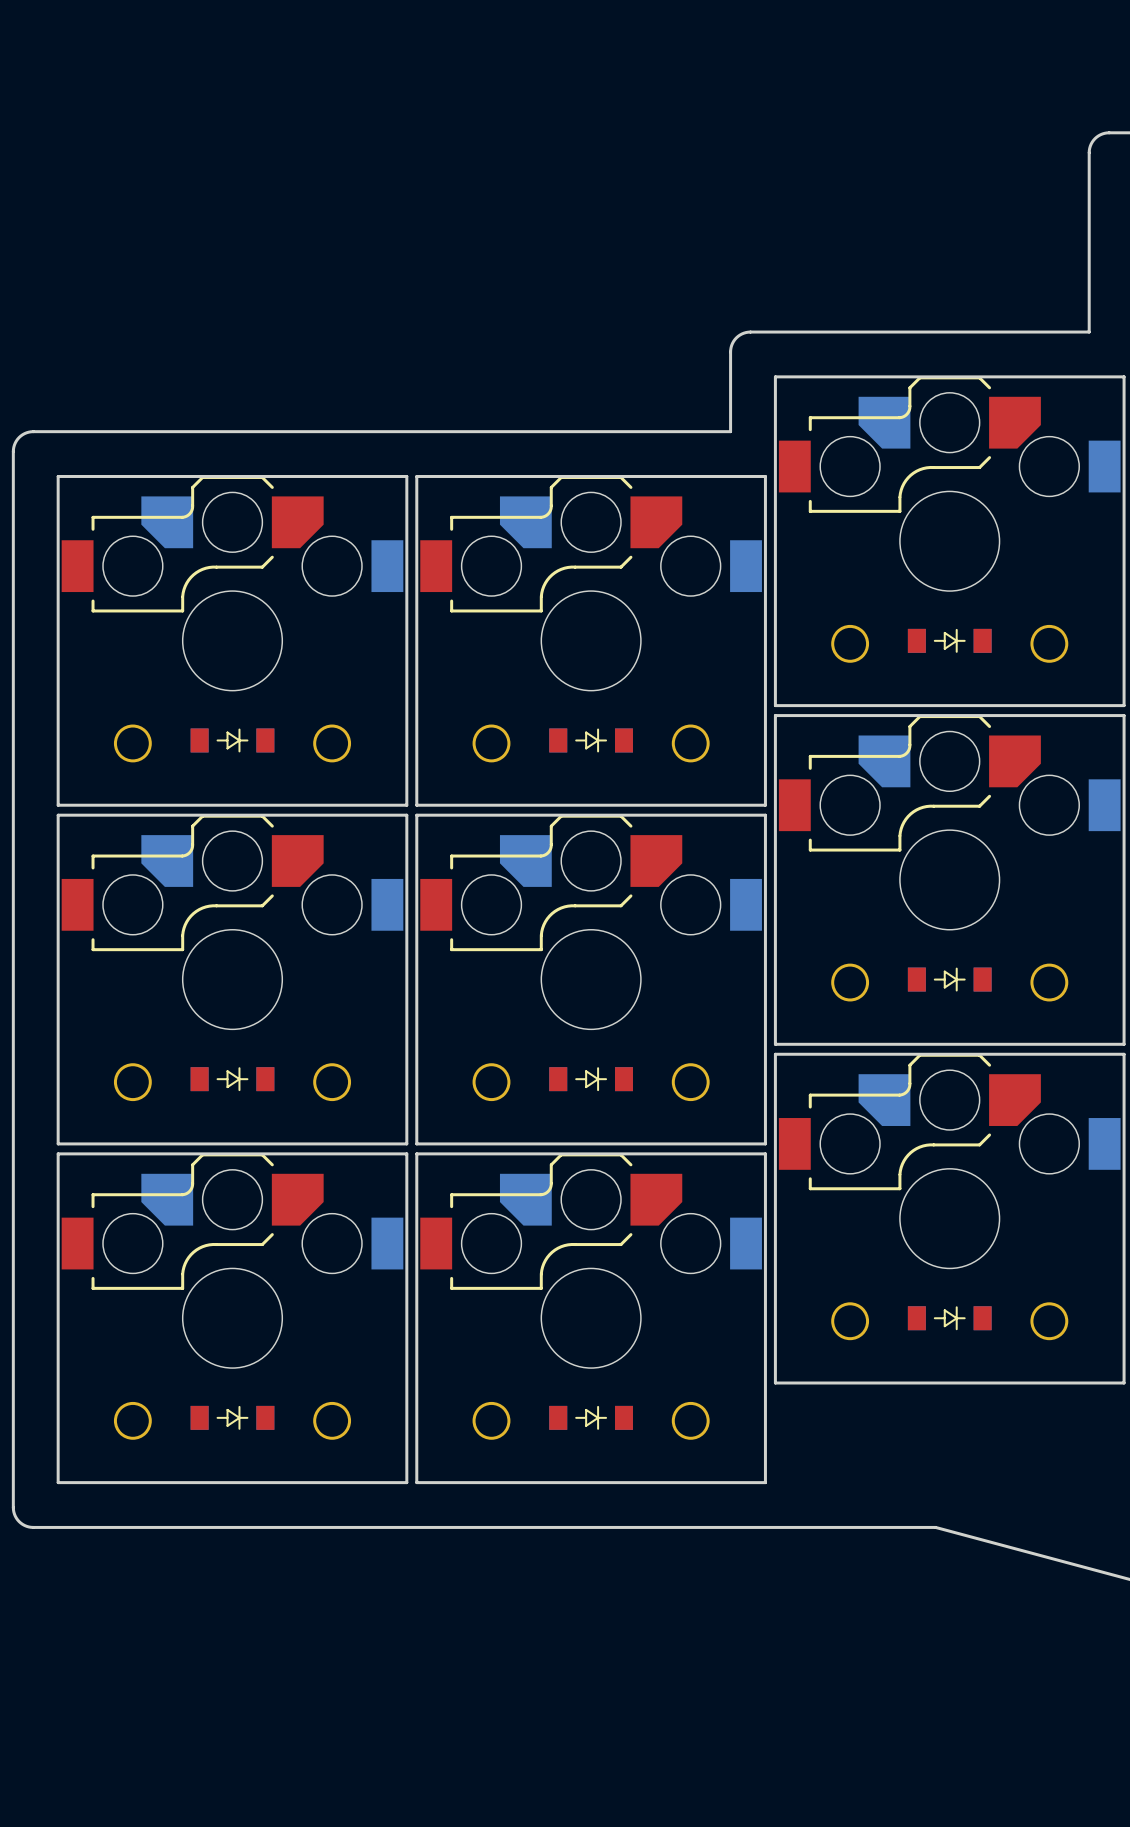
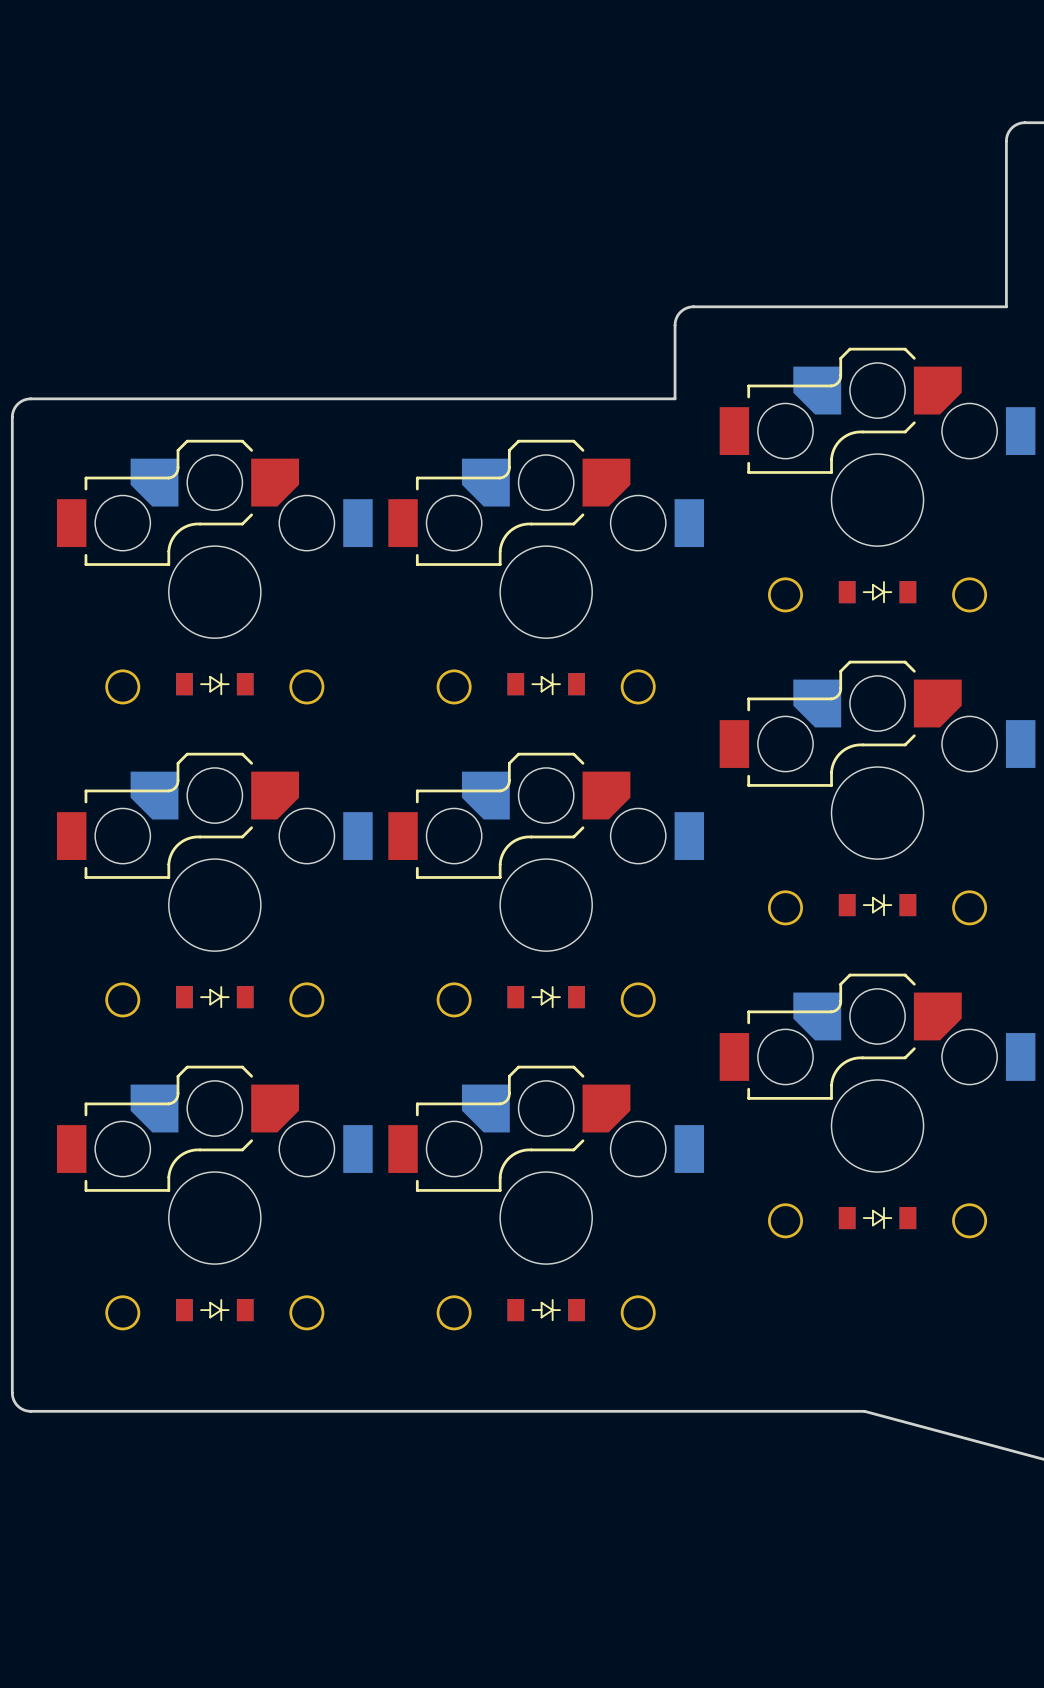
board edge: (775, 376) (775, 705) (1124, 705) (1124, 376) (775, 376) -> none
board edge: (58, 476) (58, 805) (406, 805) (406, 476) (58, 476) -> none
board edge: (416, 476) (765, 476) (765, 805) (416, 805) (416, 476) -> none
board edge: (775, 715) (775, 1044) (1124, 1044) (1124, 715) (775, 715) -> none
board edge: (58, 815) (58, 1143) (406, 1143) (406, 815) (58, 815) -> none
board edge: (416, 815) (765, 815) (765, 1143) (416, 1143) (416, 815) -> none
board edge: (775, 1054) (1124, 1054) (1124, 1383) (775, 1383) (775, 1054) -> none
board edge: (58, 1153) (406, 1153) (406, 1482) (58, 1482) (58, 1153) -> none
board edge: (416, 1153) (765, 1153) (765, 1482) (416, 1482) (416, 1153) -> none

